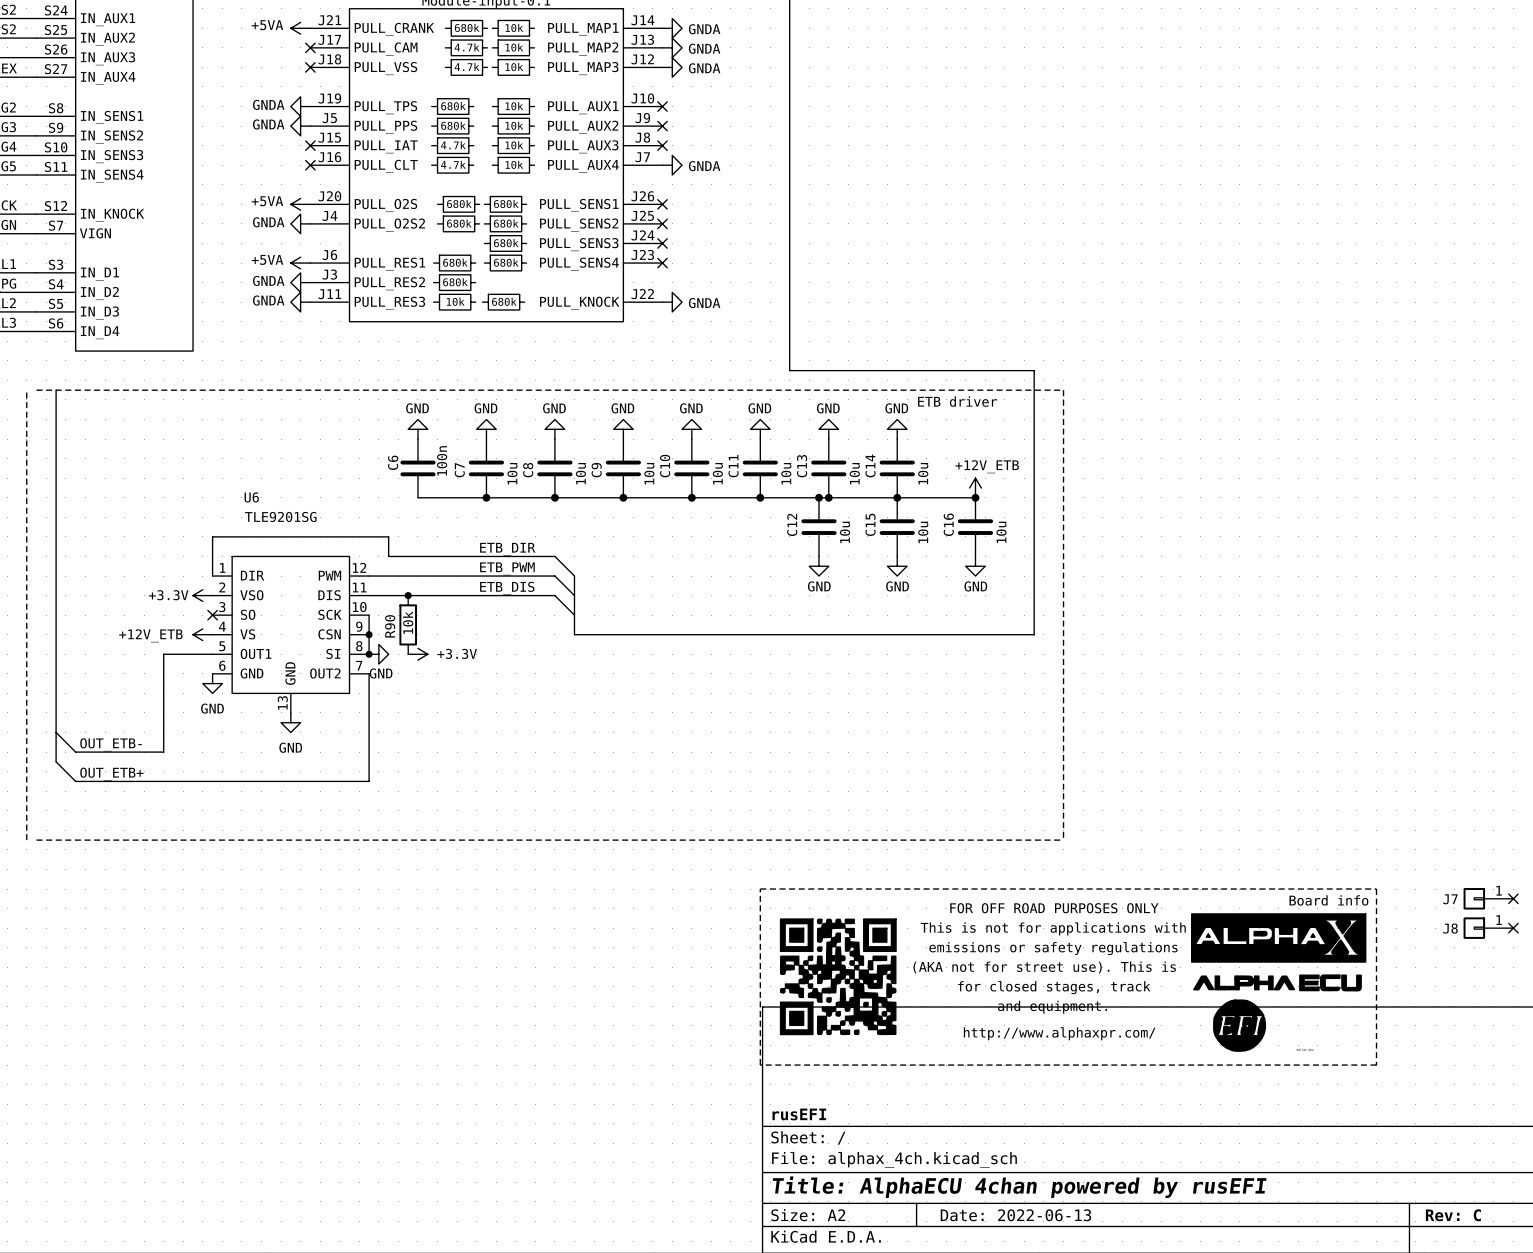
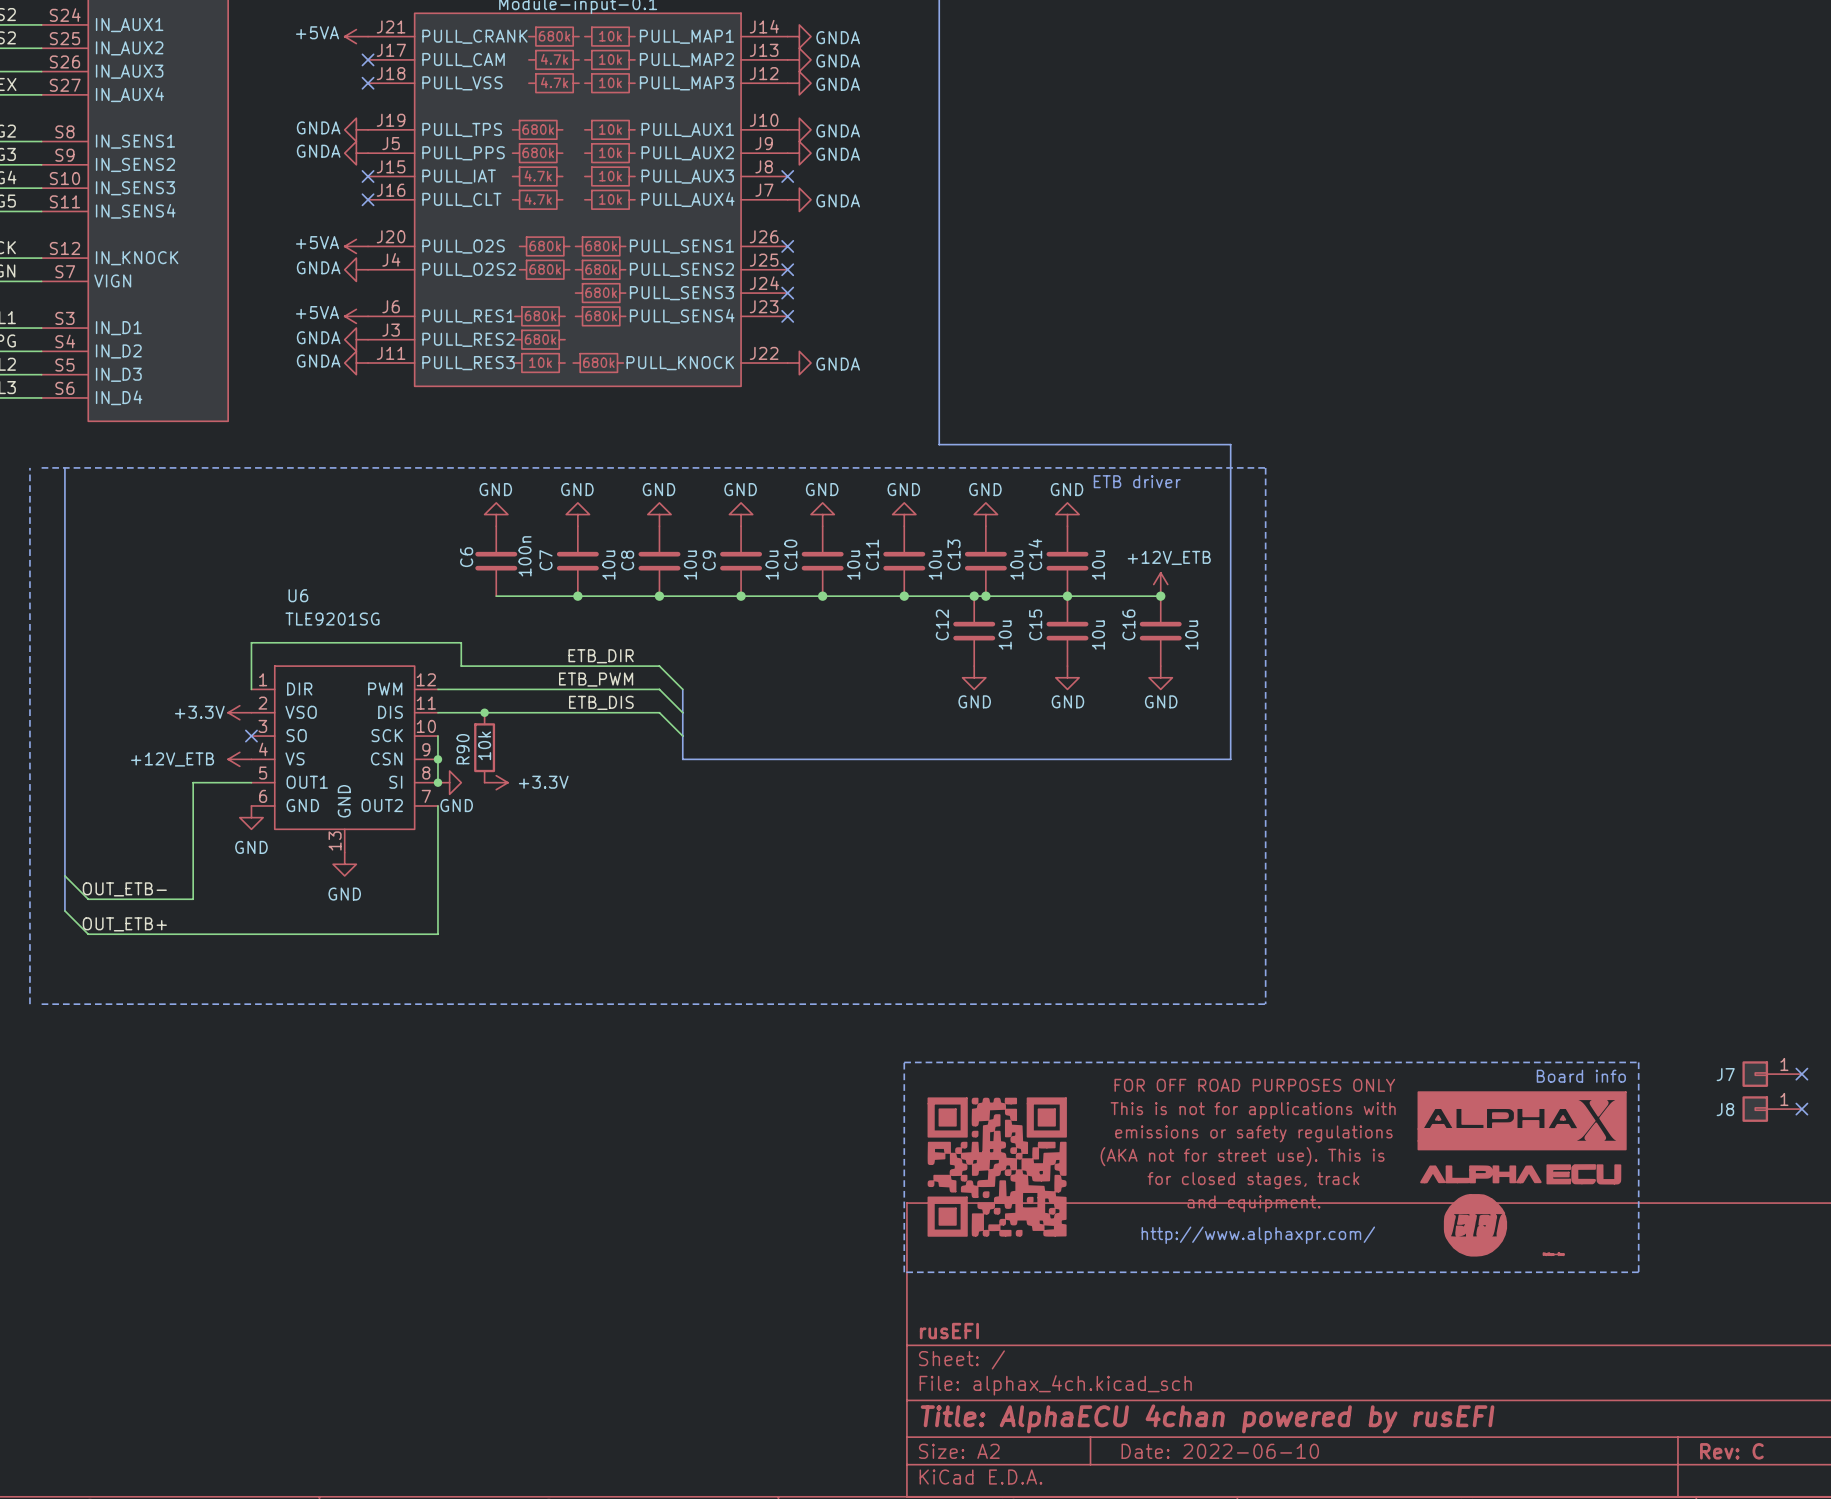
no-connect mark: (662, 106) -> none
power symbol: none -> GNDA (799, 129)
no-connect mark: (662, 126) -> none
power symbol: none -> GNDA (799, 153)
title block: Date: 2022-06-13 (1015, 1215) -> Date: 2022-06-10 (1220, 1451)

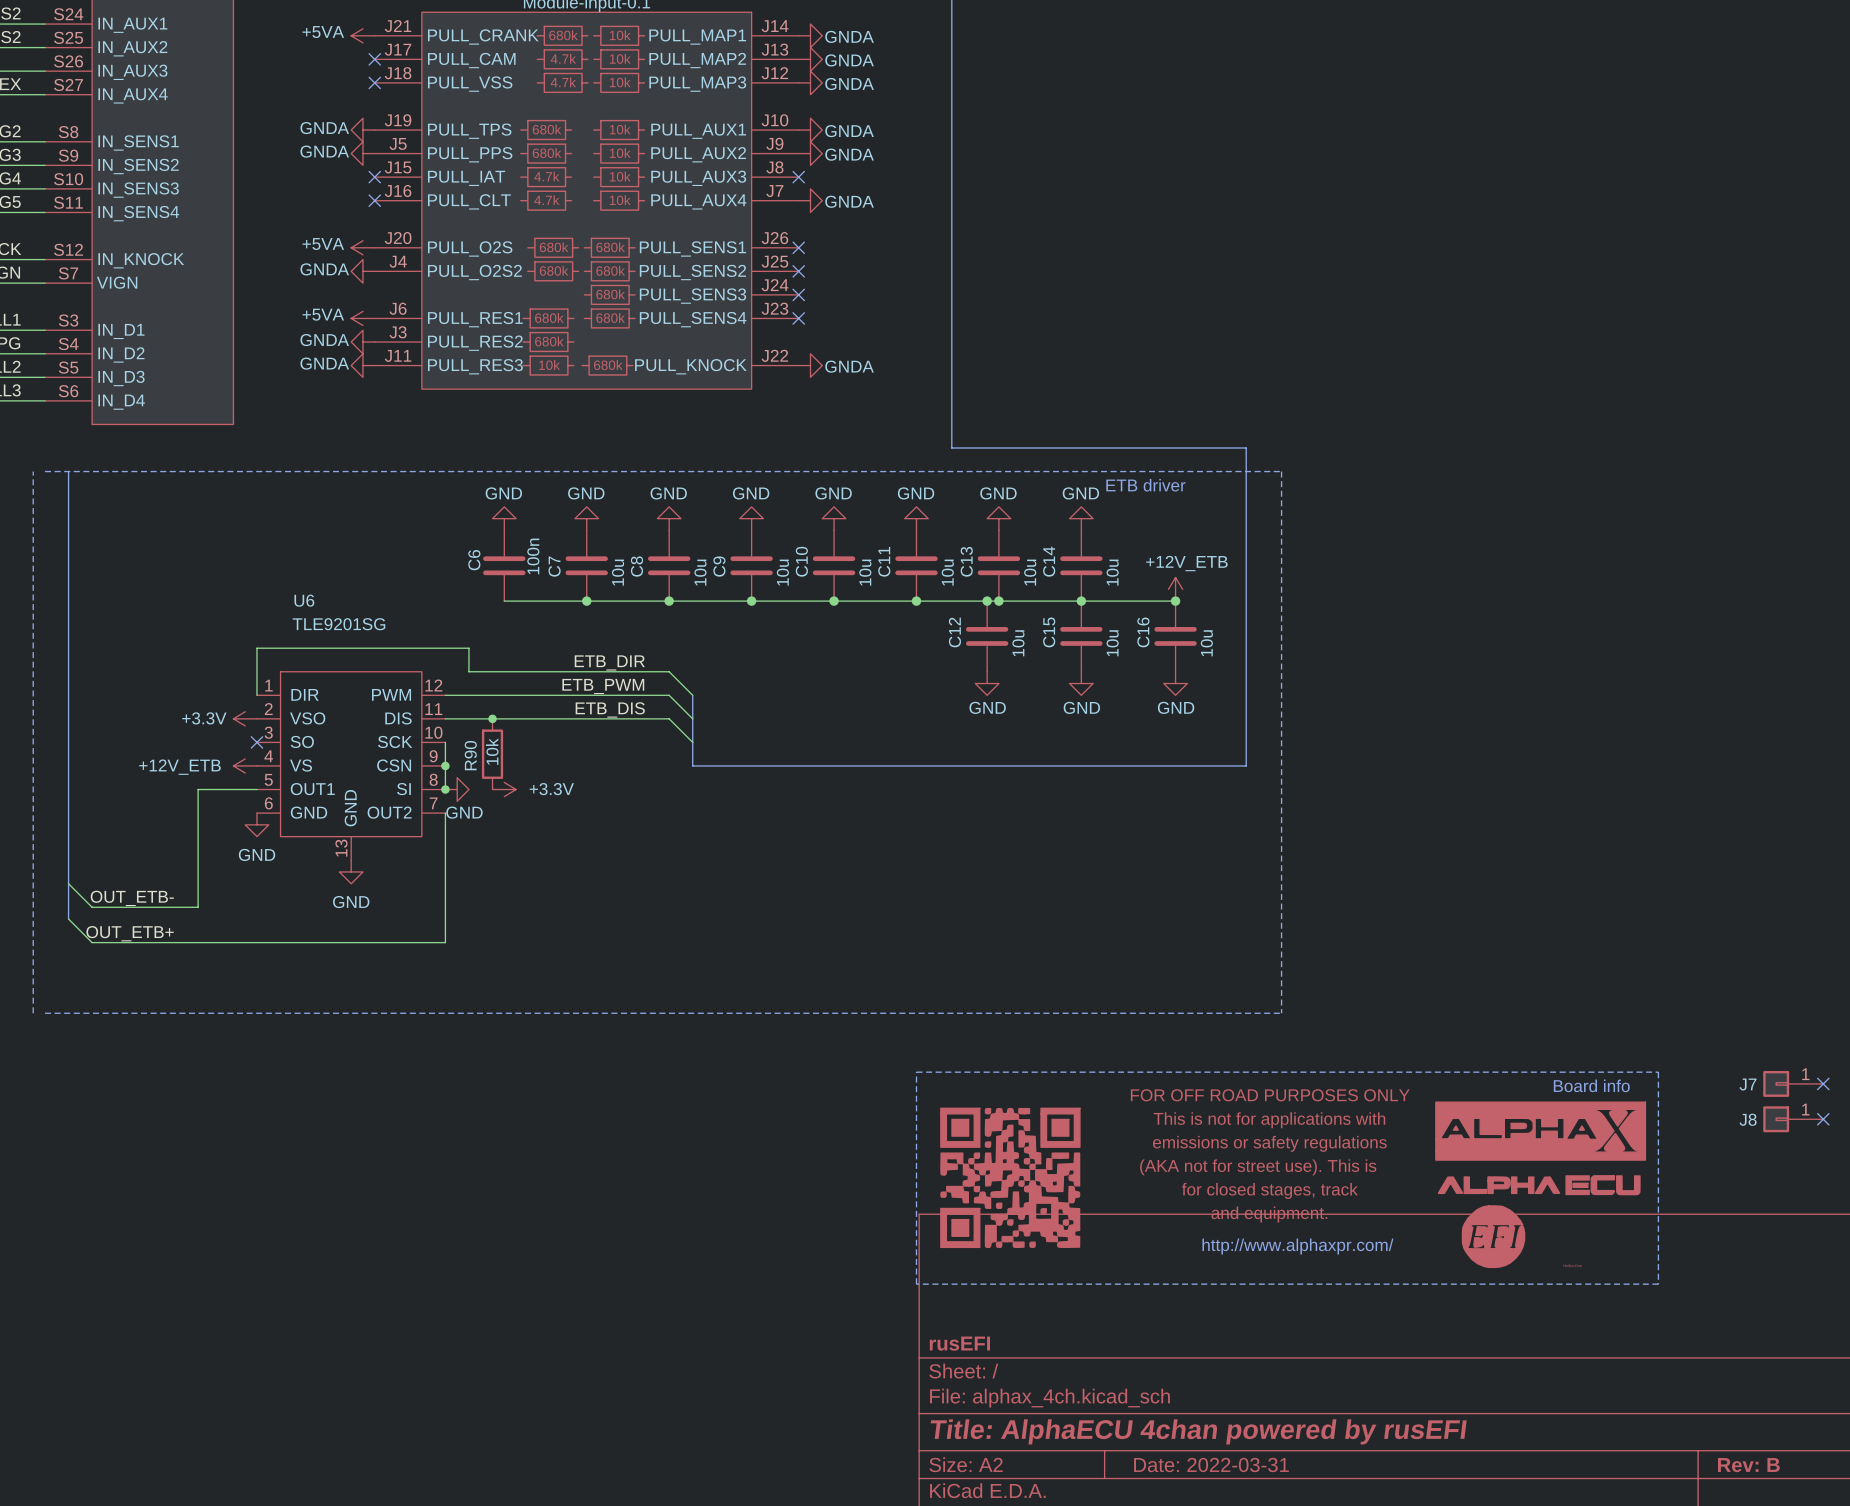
title block: Date: 2022-06-10 (1220, 1451) -> Date: 2022-03-31 (1211, 1465)
title block: Rev: C (1731, 1451) -> Rev: B (1748, 1465)

